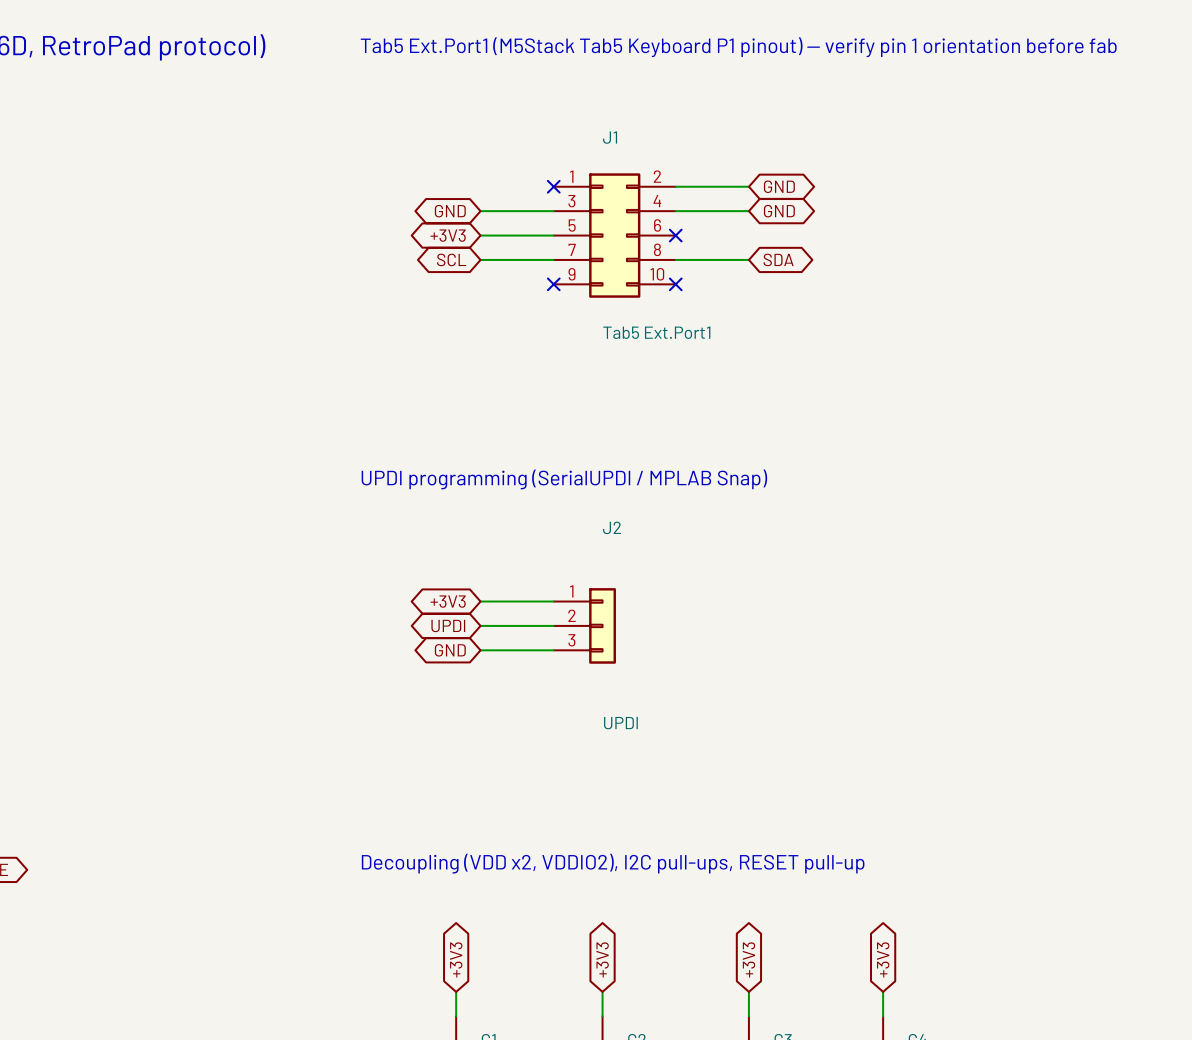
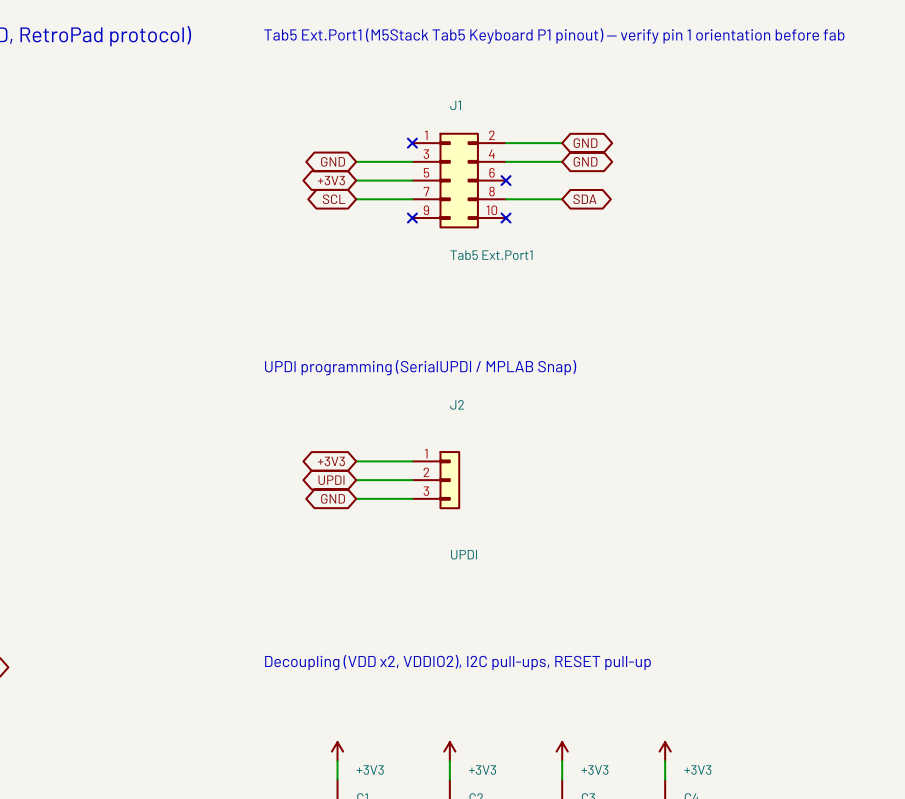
global label: +3V3 (456, 959) -> none
global label: +3V3 (602, 959) -> none
global label: +3V3 (749, 959) -> none
global label: +3V3 (883, 959) -> none
power symbol: none -> +3V3 (337, 751)
power symbol: none -> +3V3 (449, 751)
power symbol: none -> +3V3 (562, 751)
power symbol: none -> +3V3 (665, 751)

